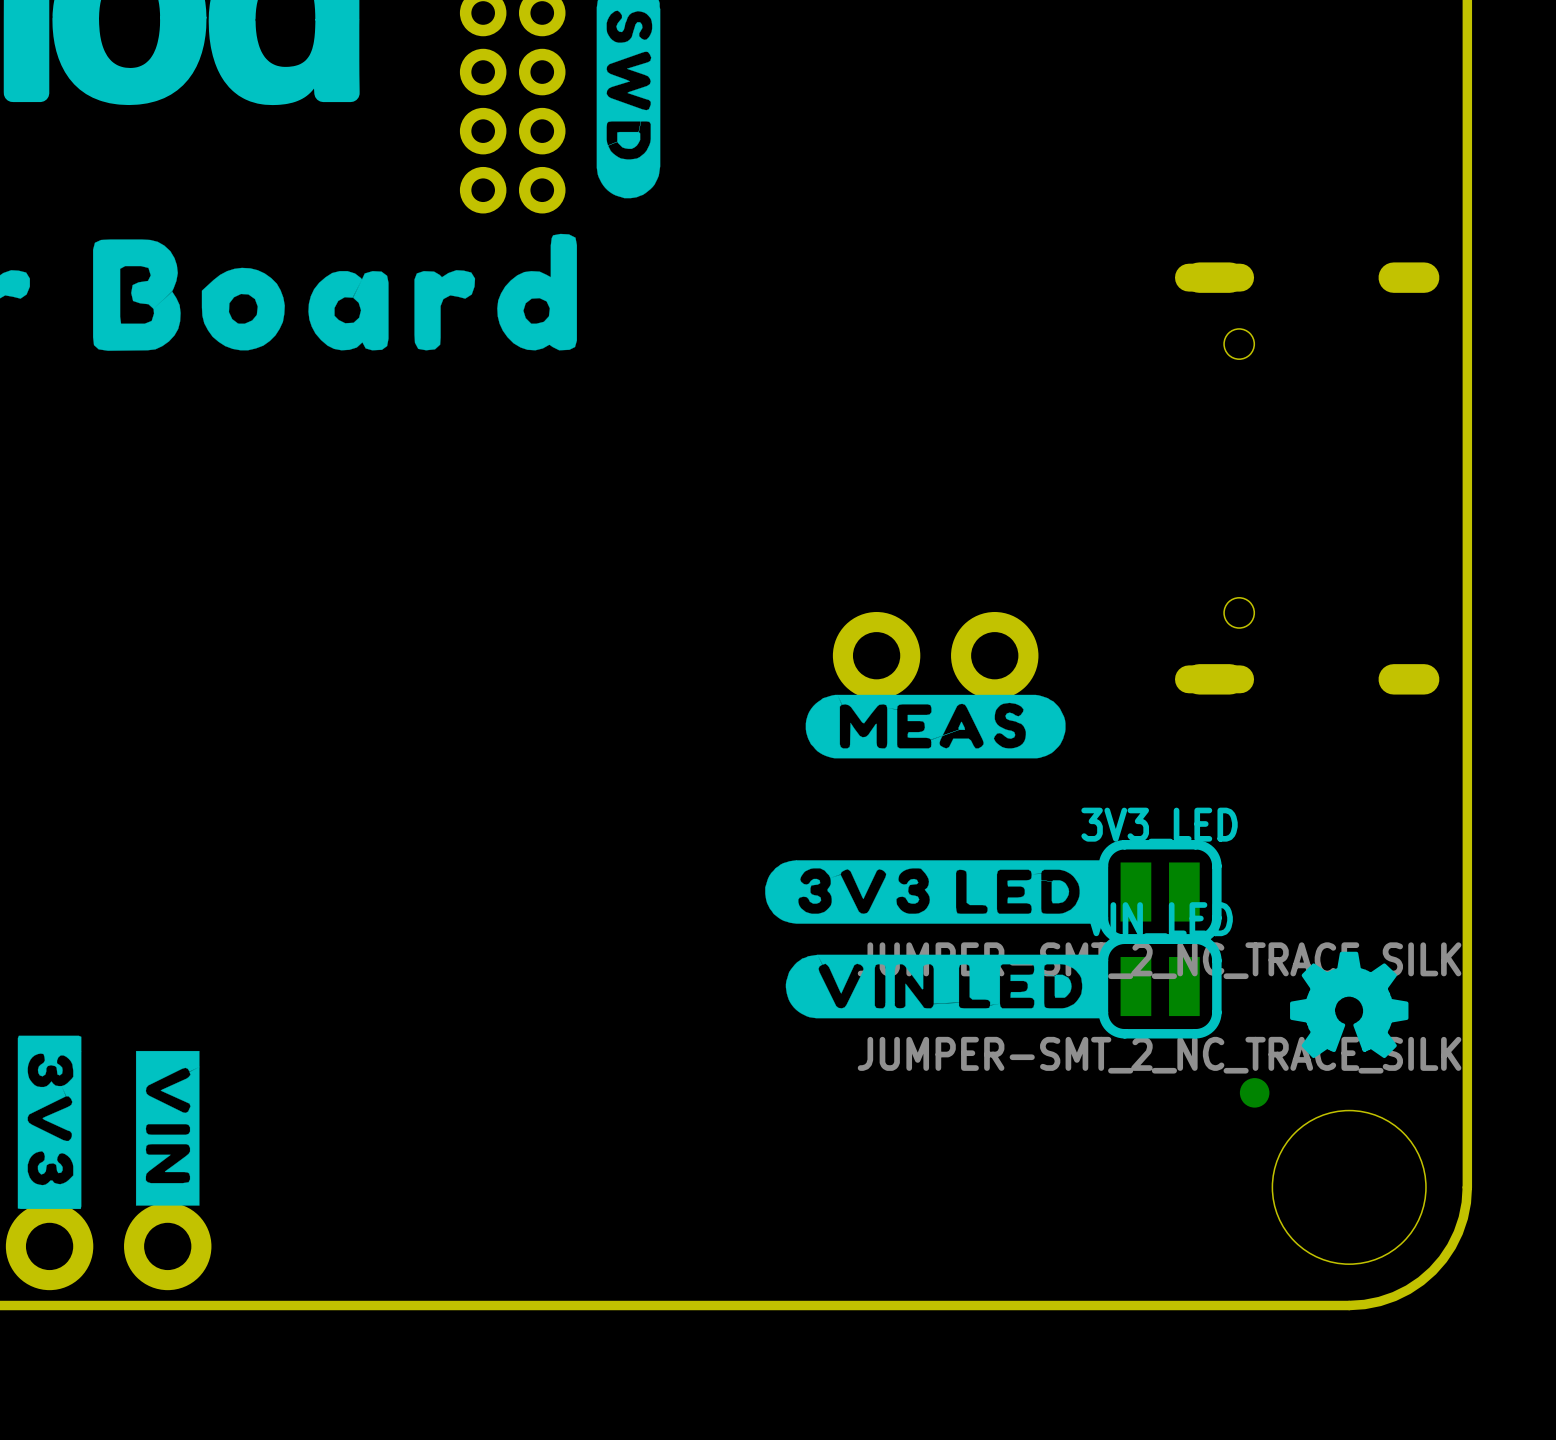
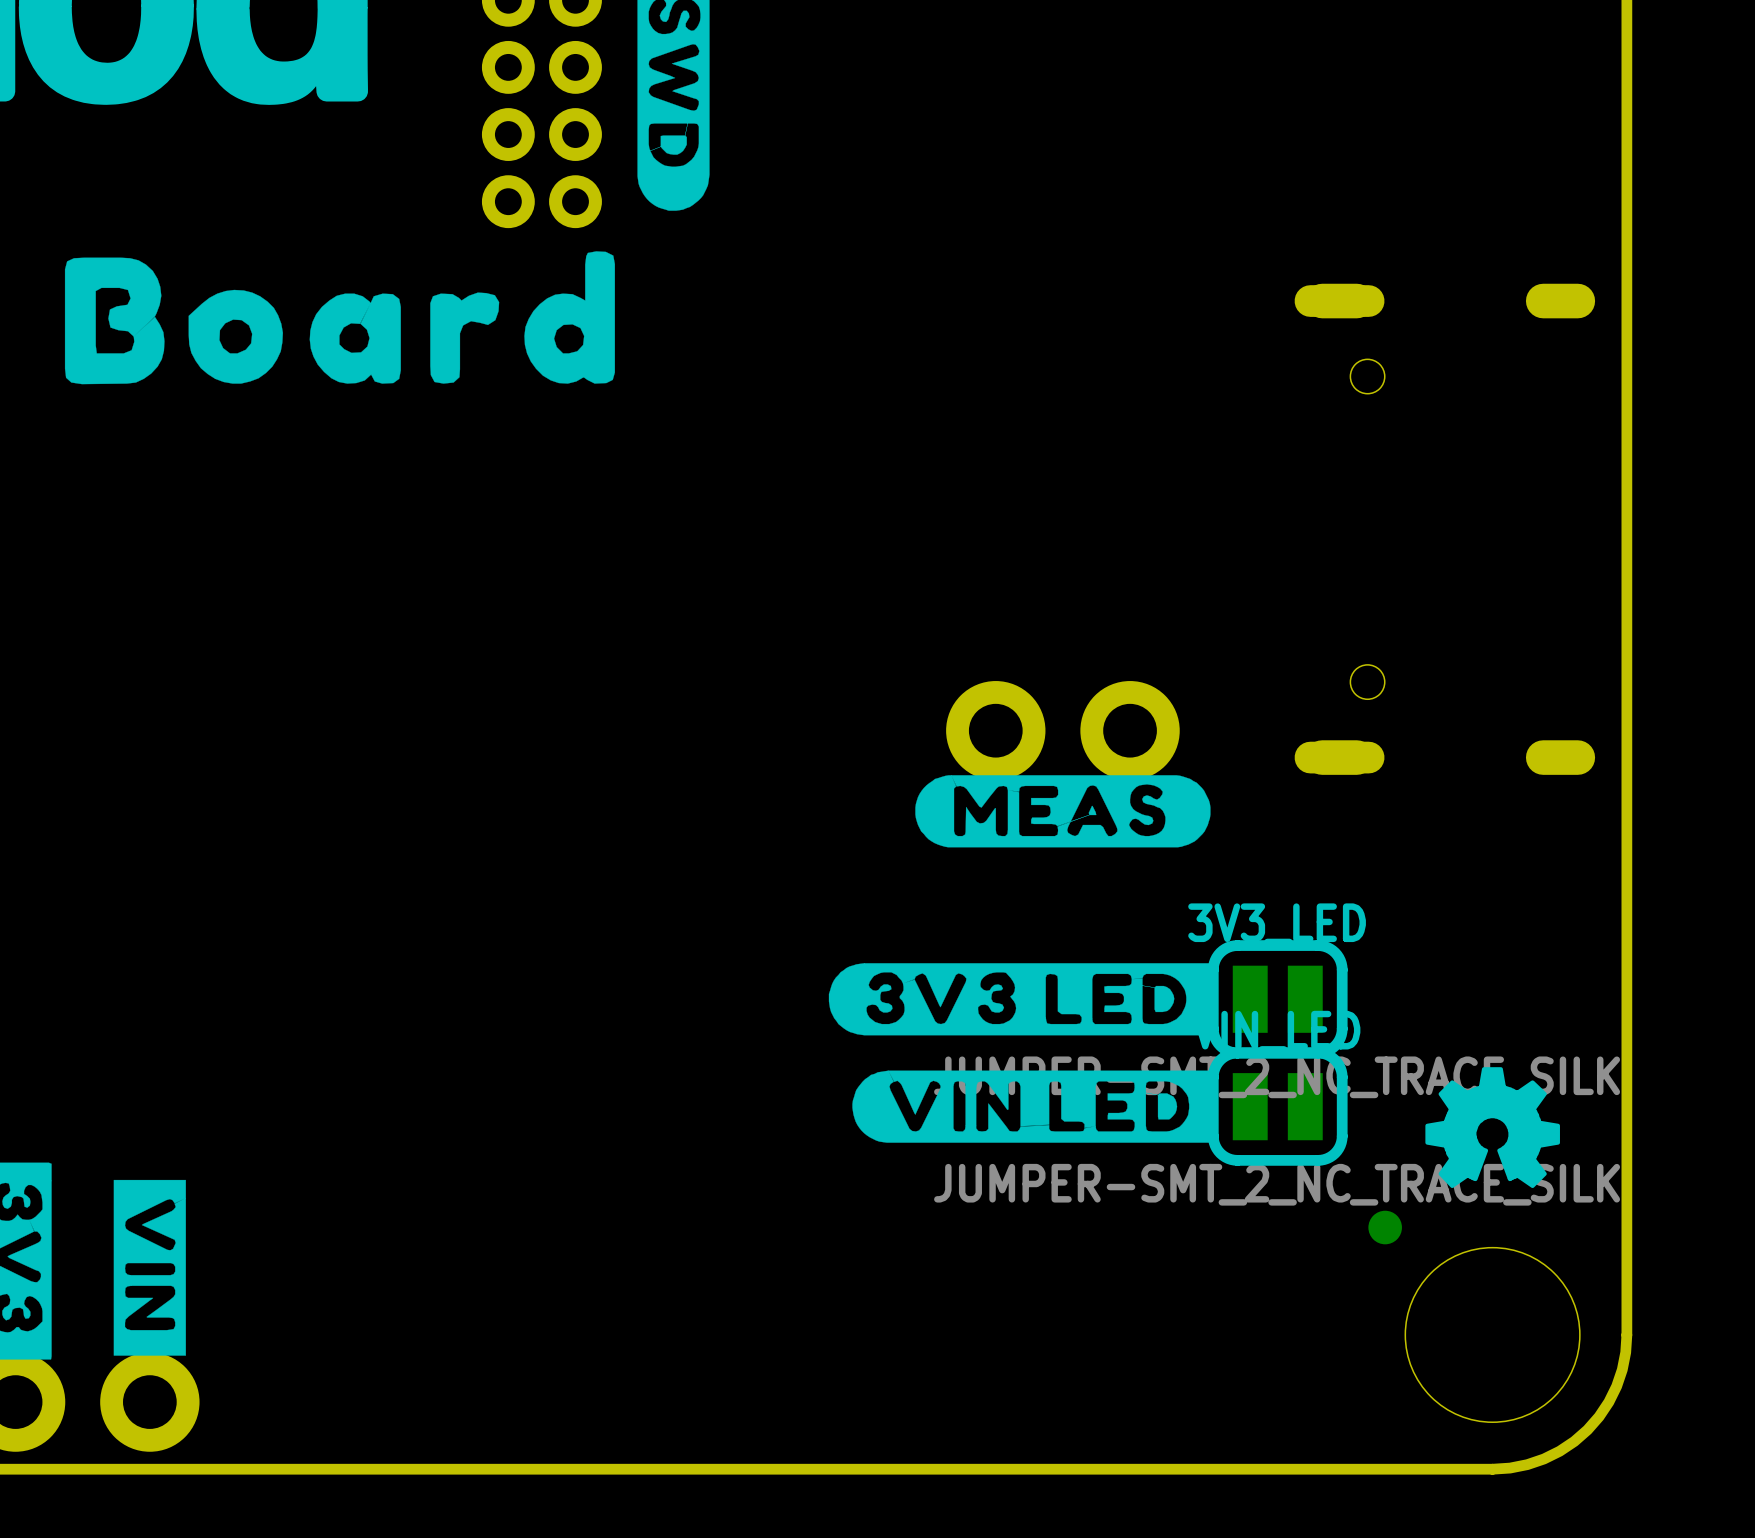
part position: (935, 655) -> (1062, 730)
drawing position: (935, 726) -> (1062, 811)

